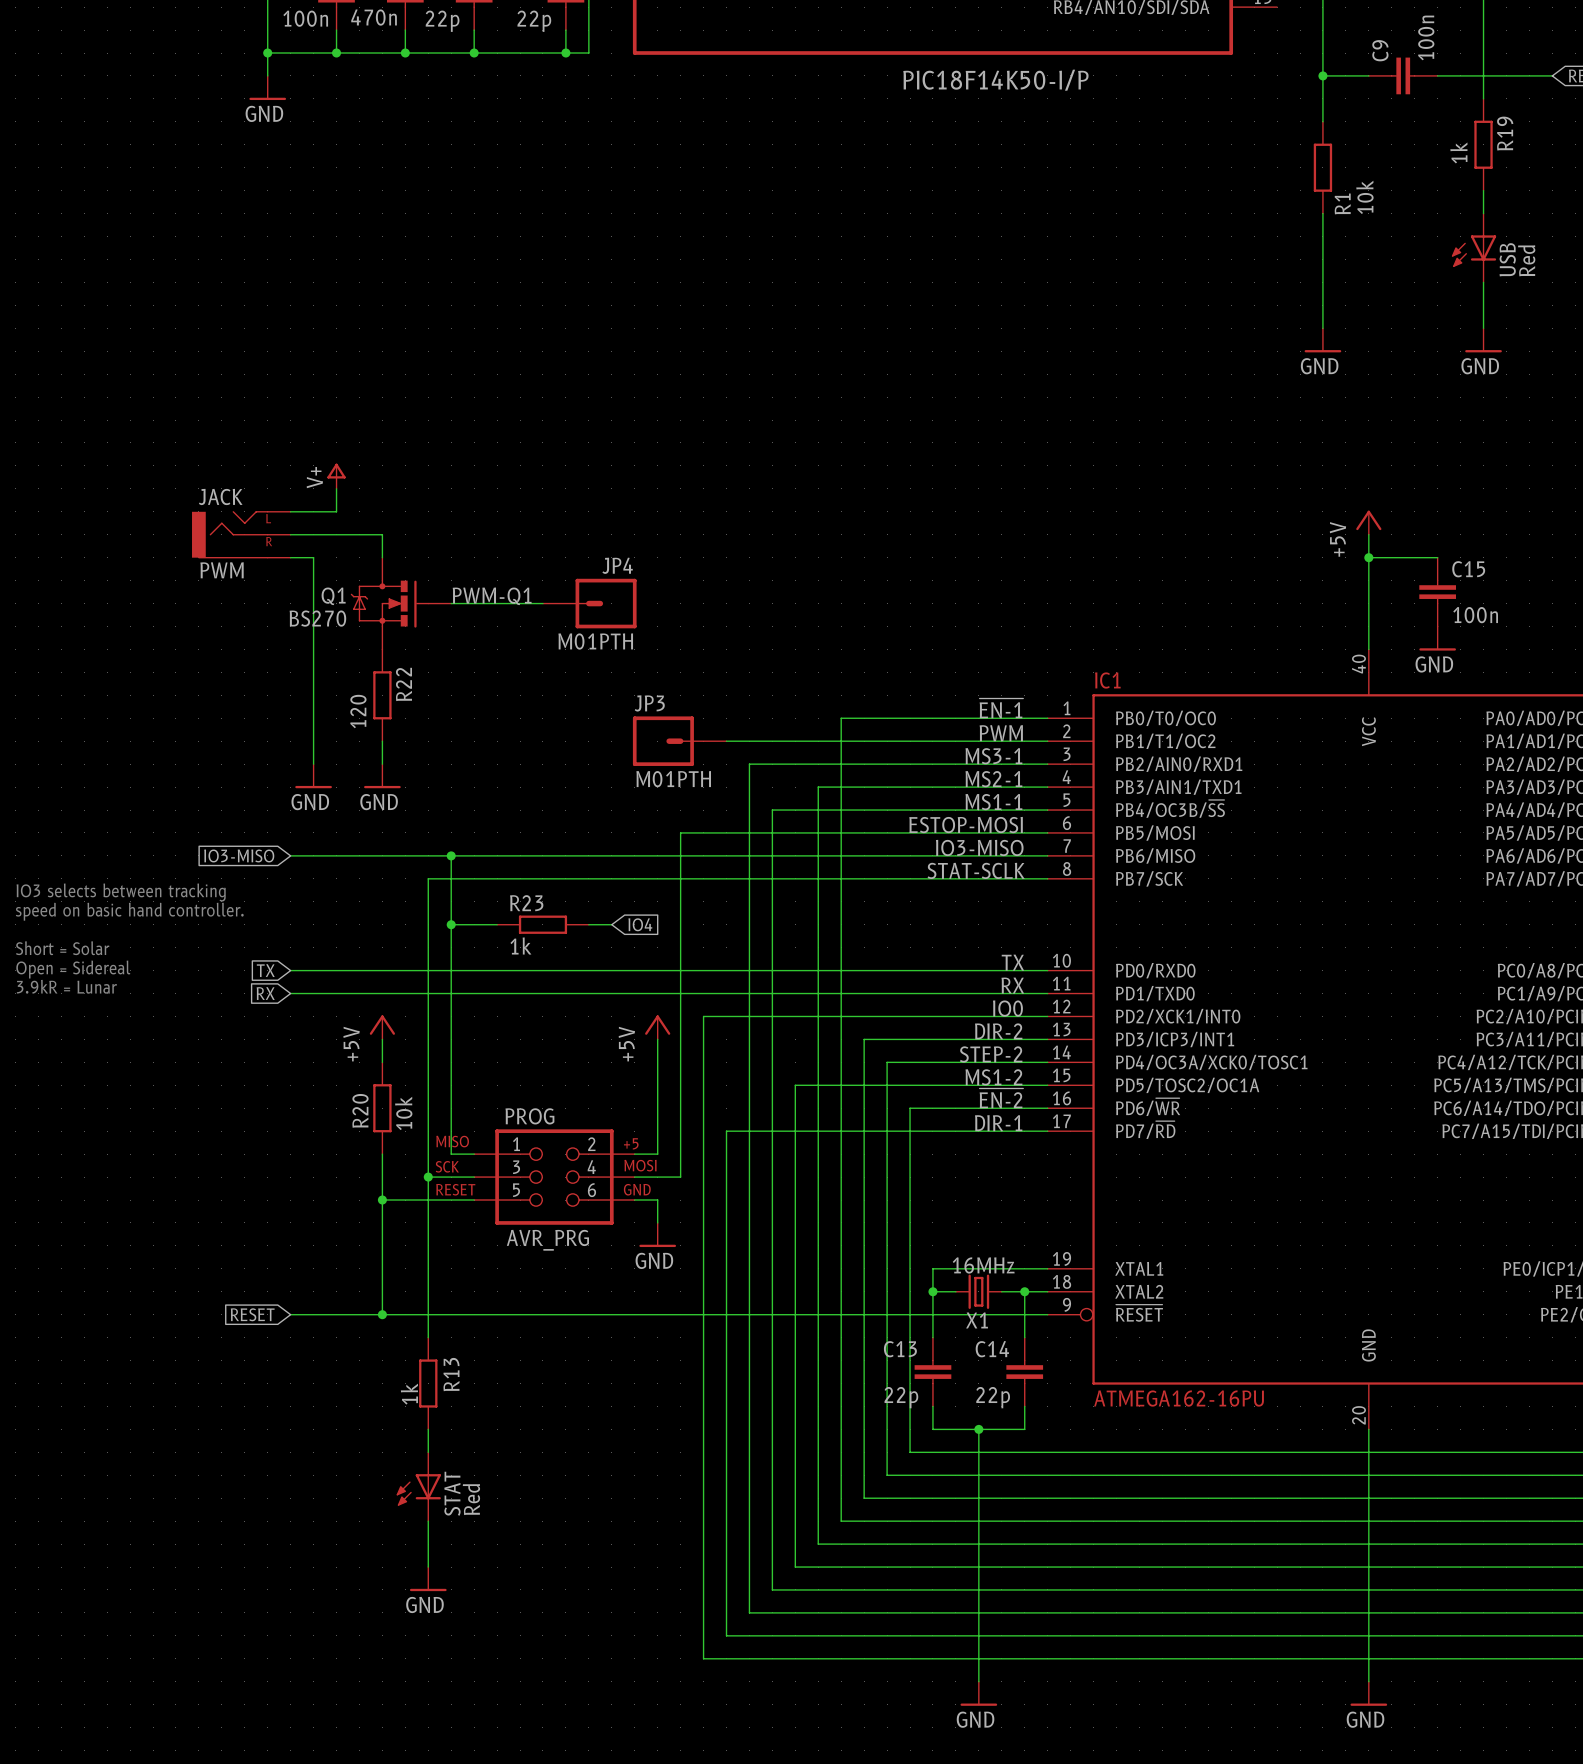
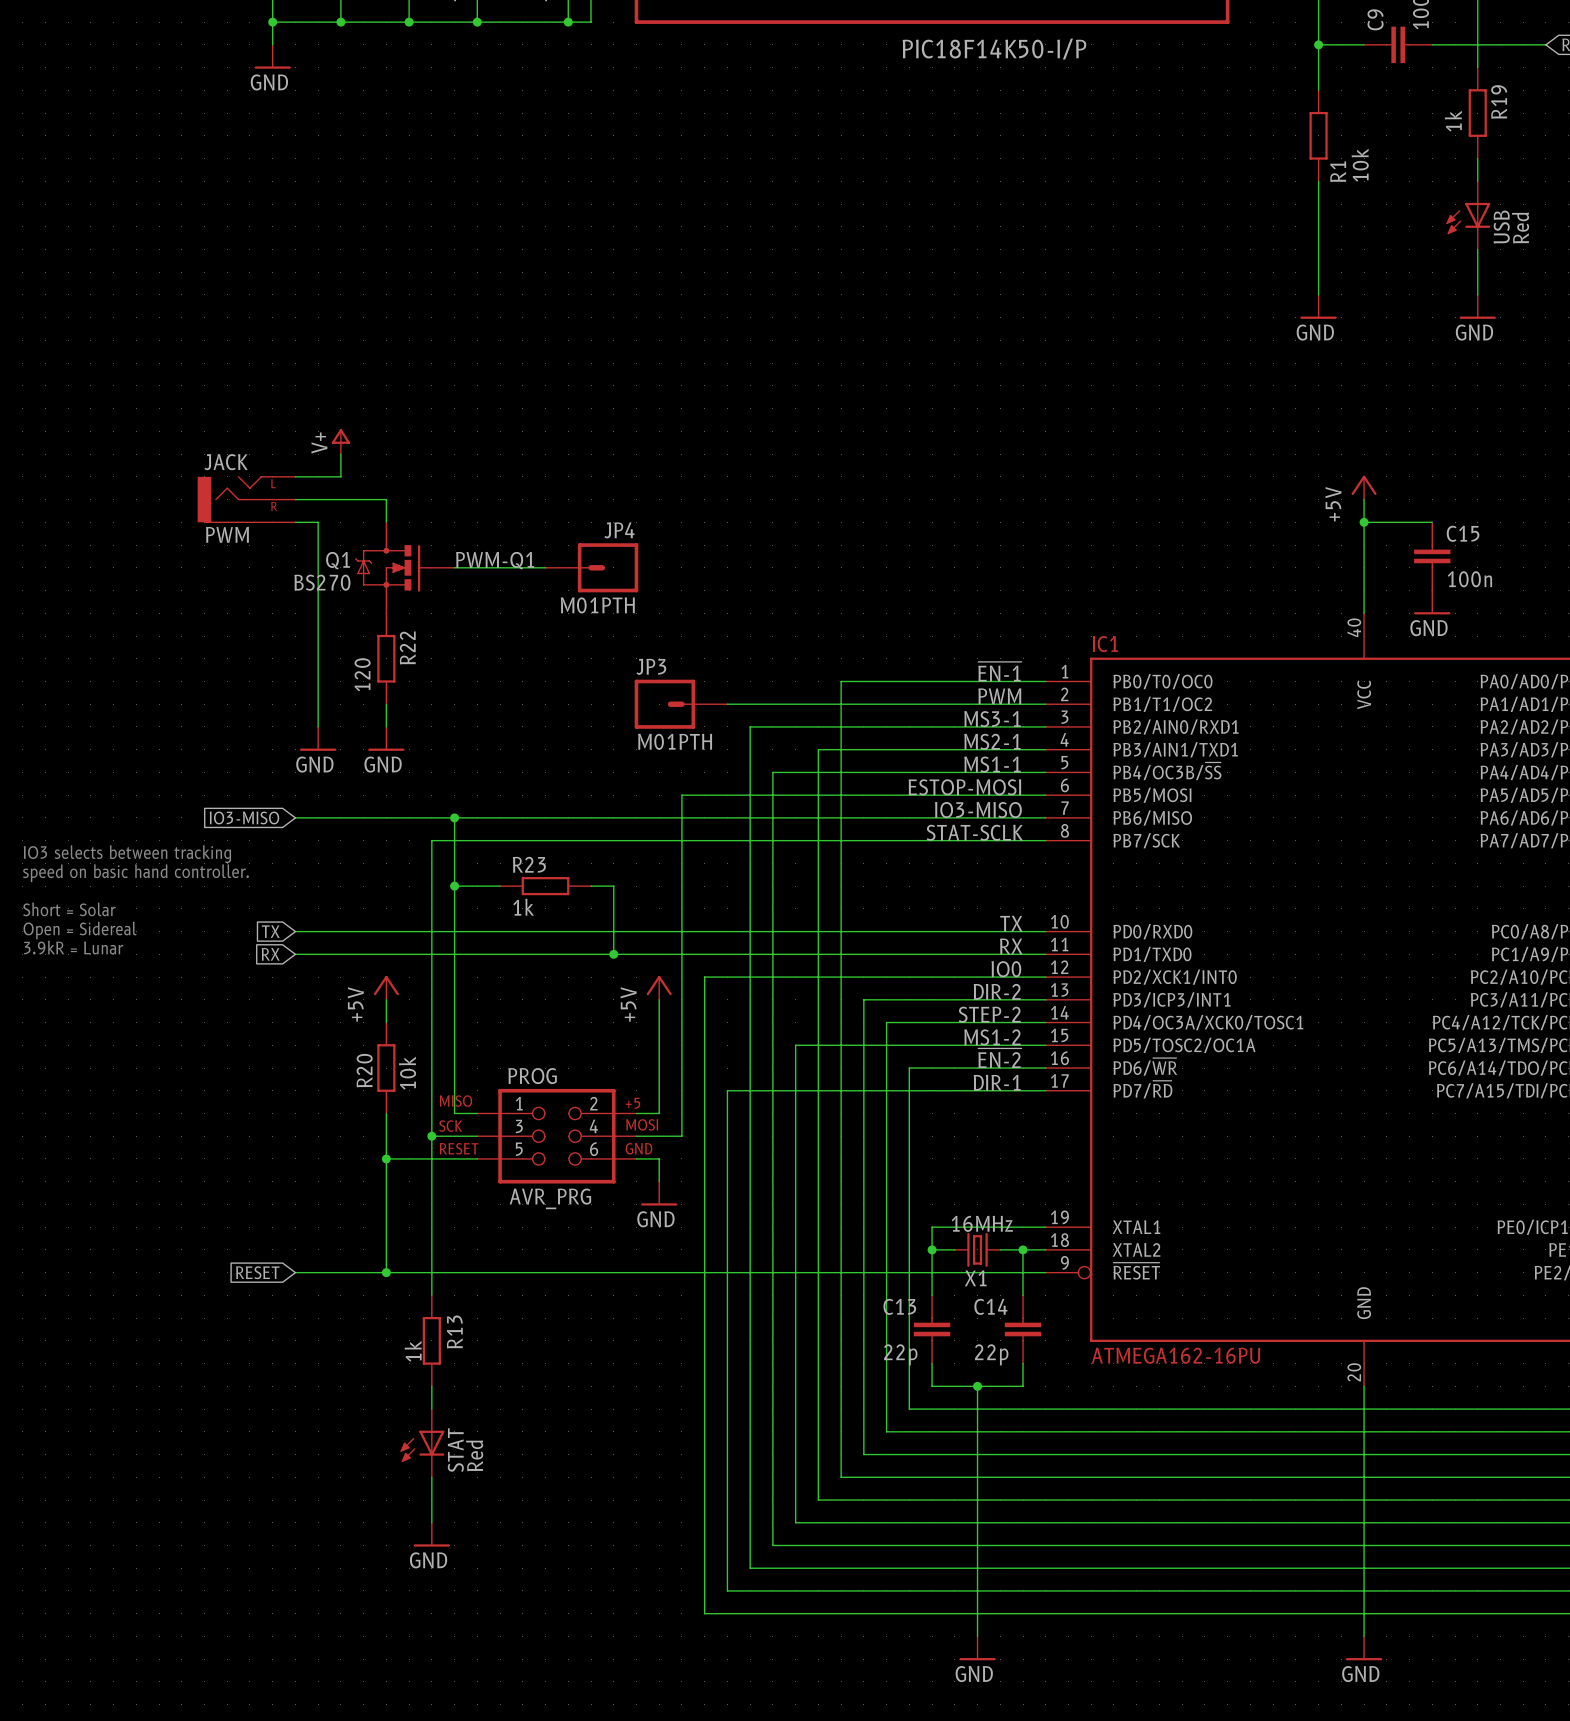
wire: none -> (613, 886) (613, 954)
global label: IO4 (640, 924) -> none
junction: none -> (613, 954)

